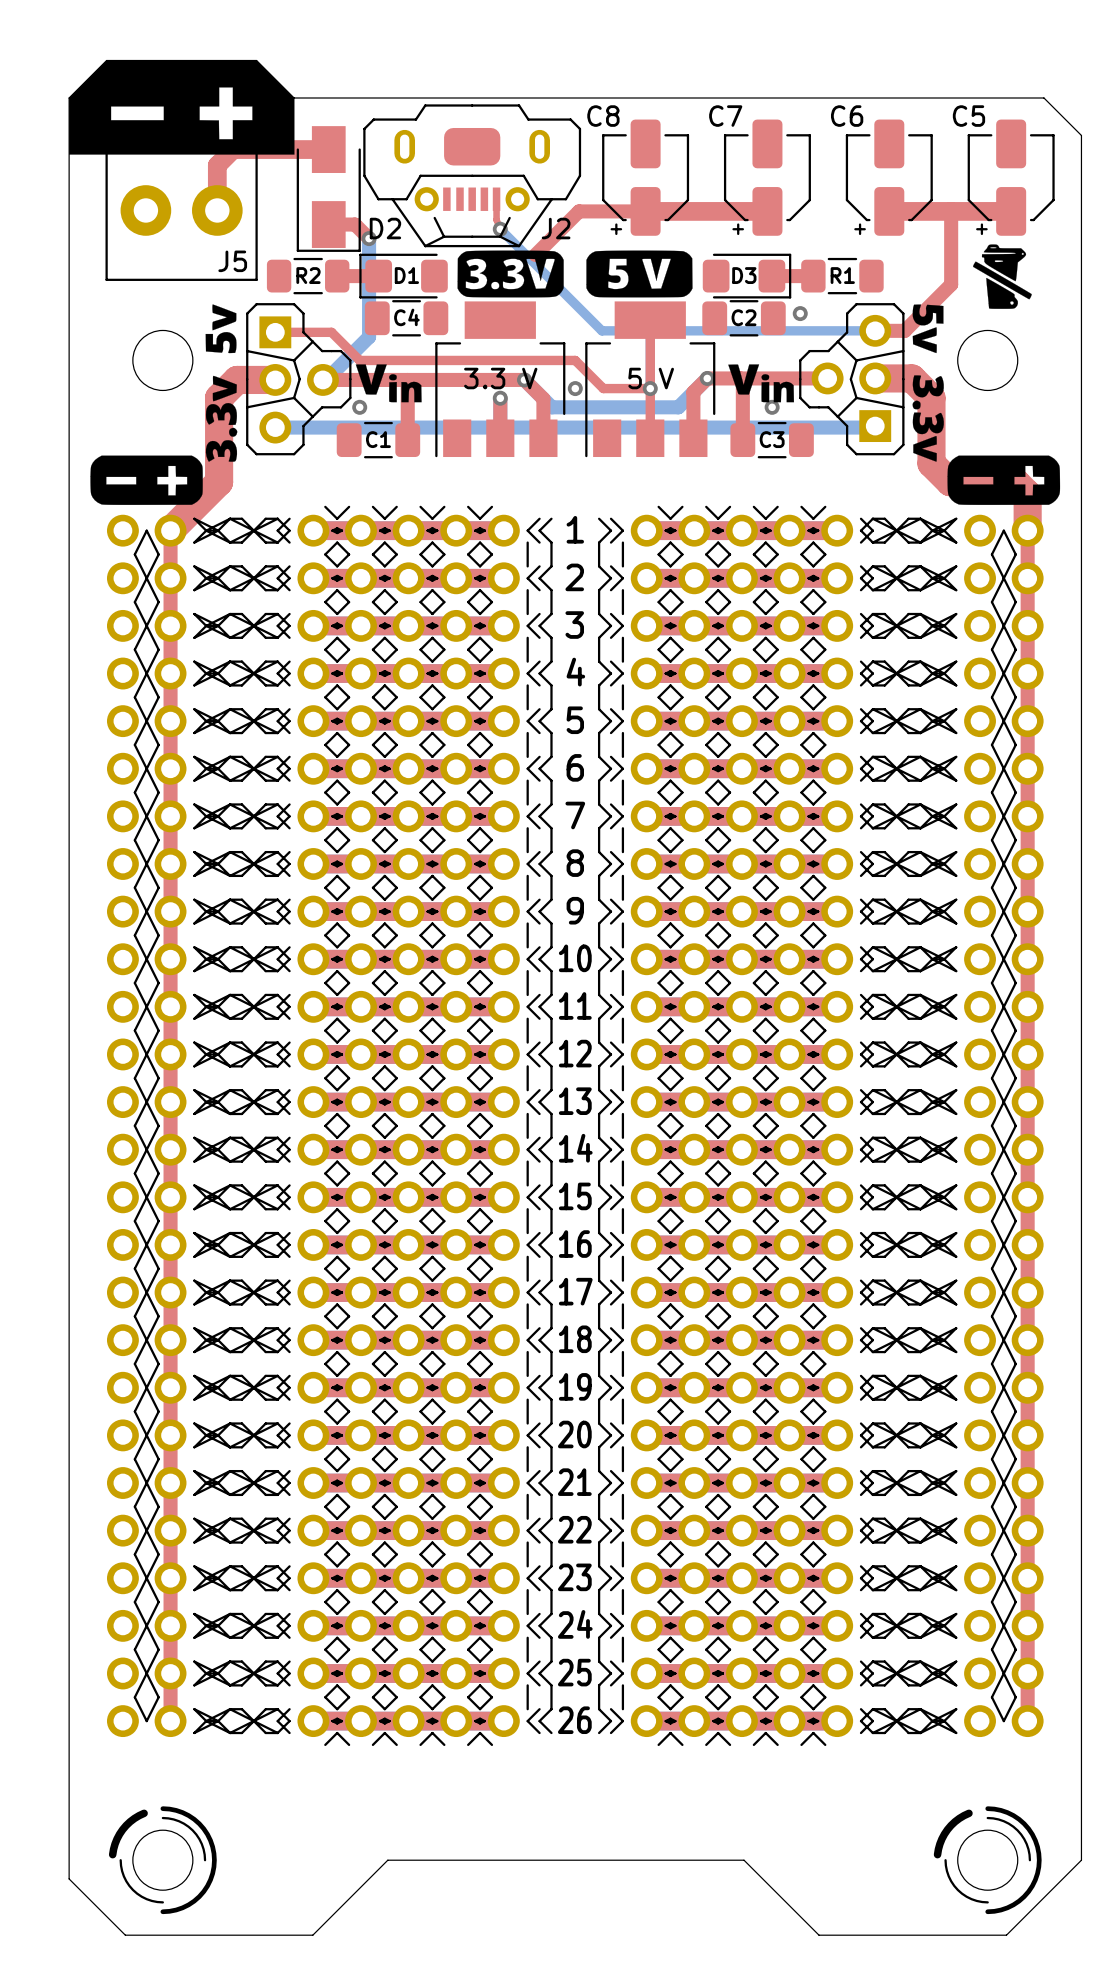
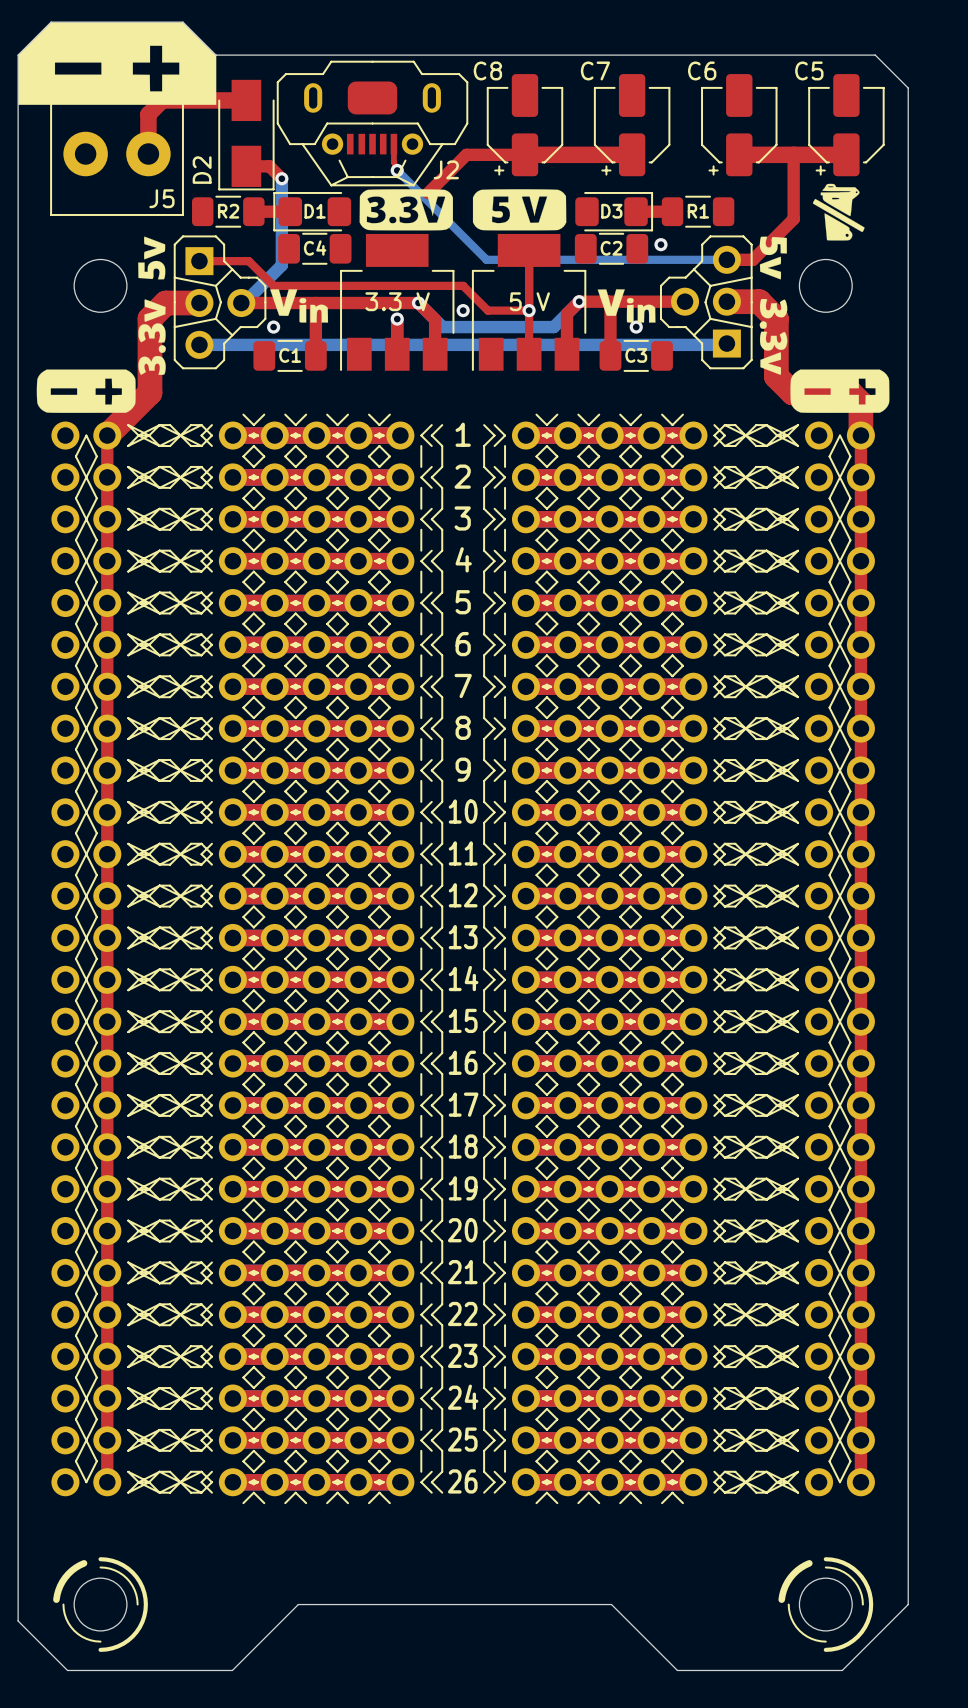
D2 name rotation: 0° (385, 228) -> 90° counterclockwise (202, 170)
D2 name position: D2 (385, 228) -> D2 (202, 170)

